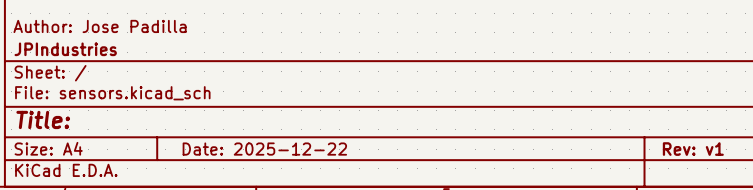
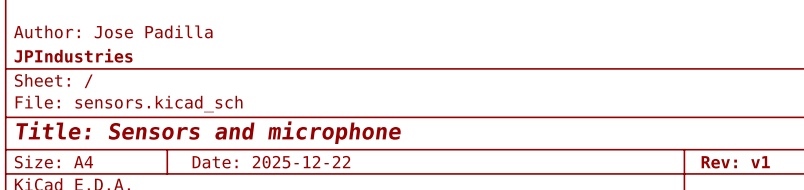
title block: Title: (43, 119) -> Title: Sensors and microphone (208, 132)

